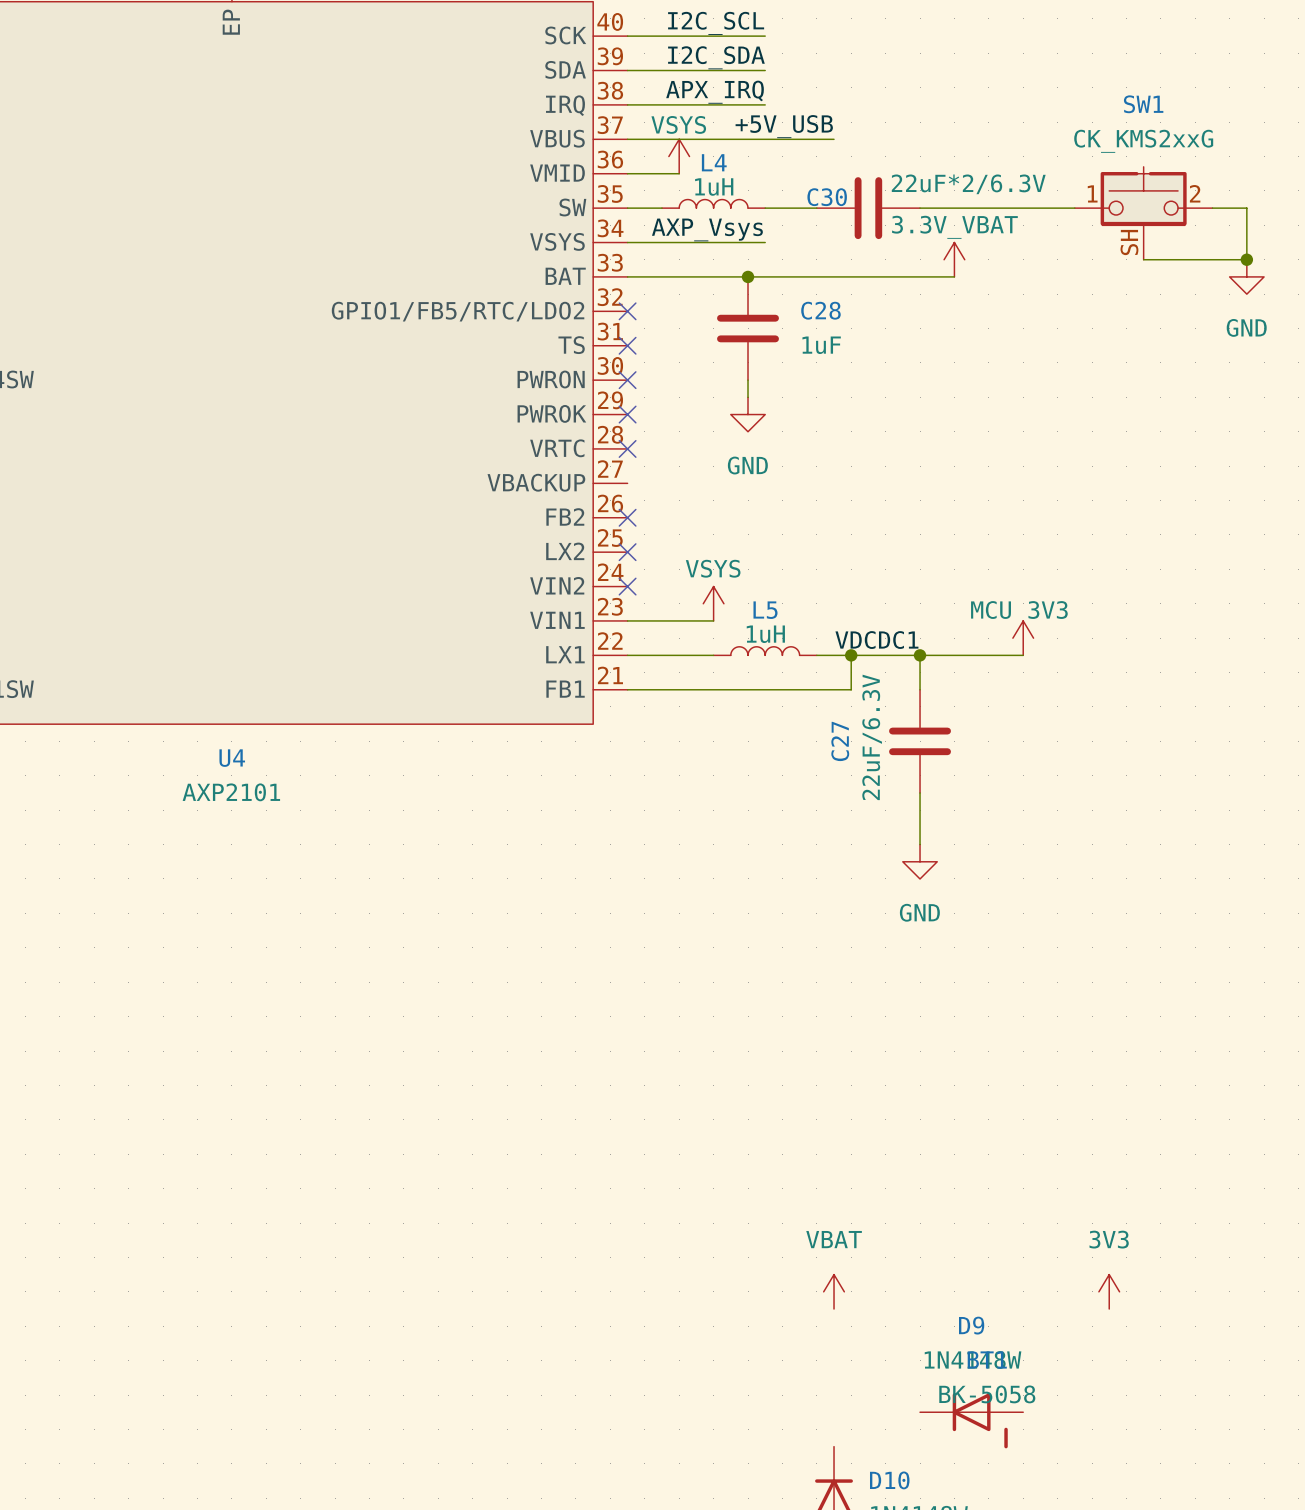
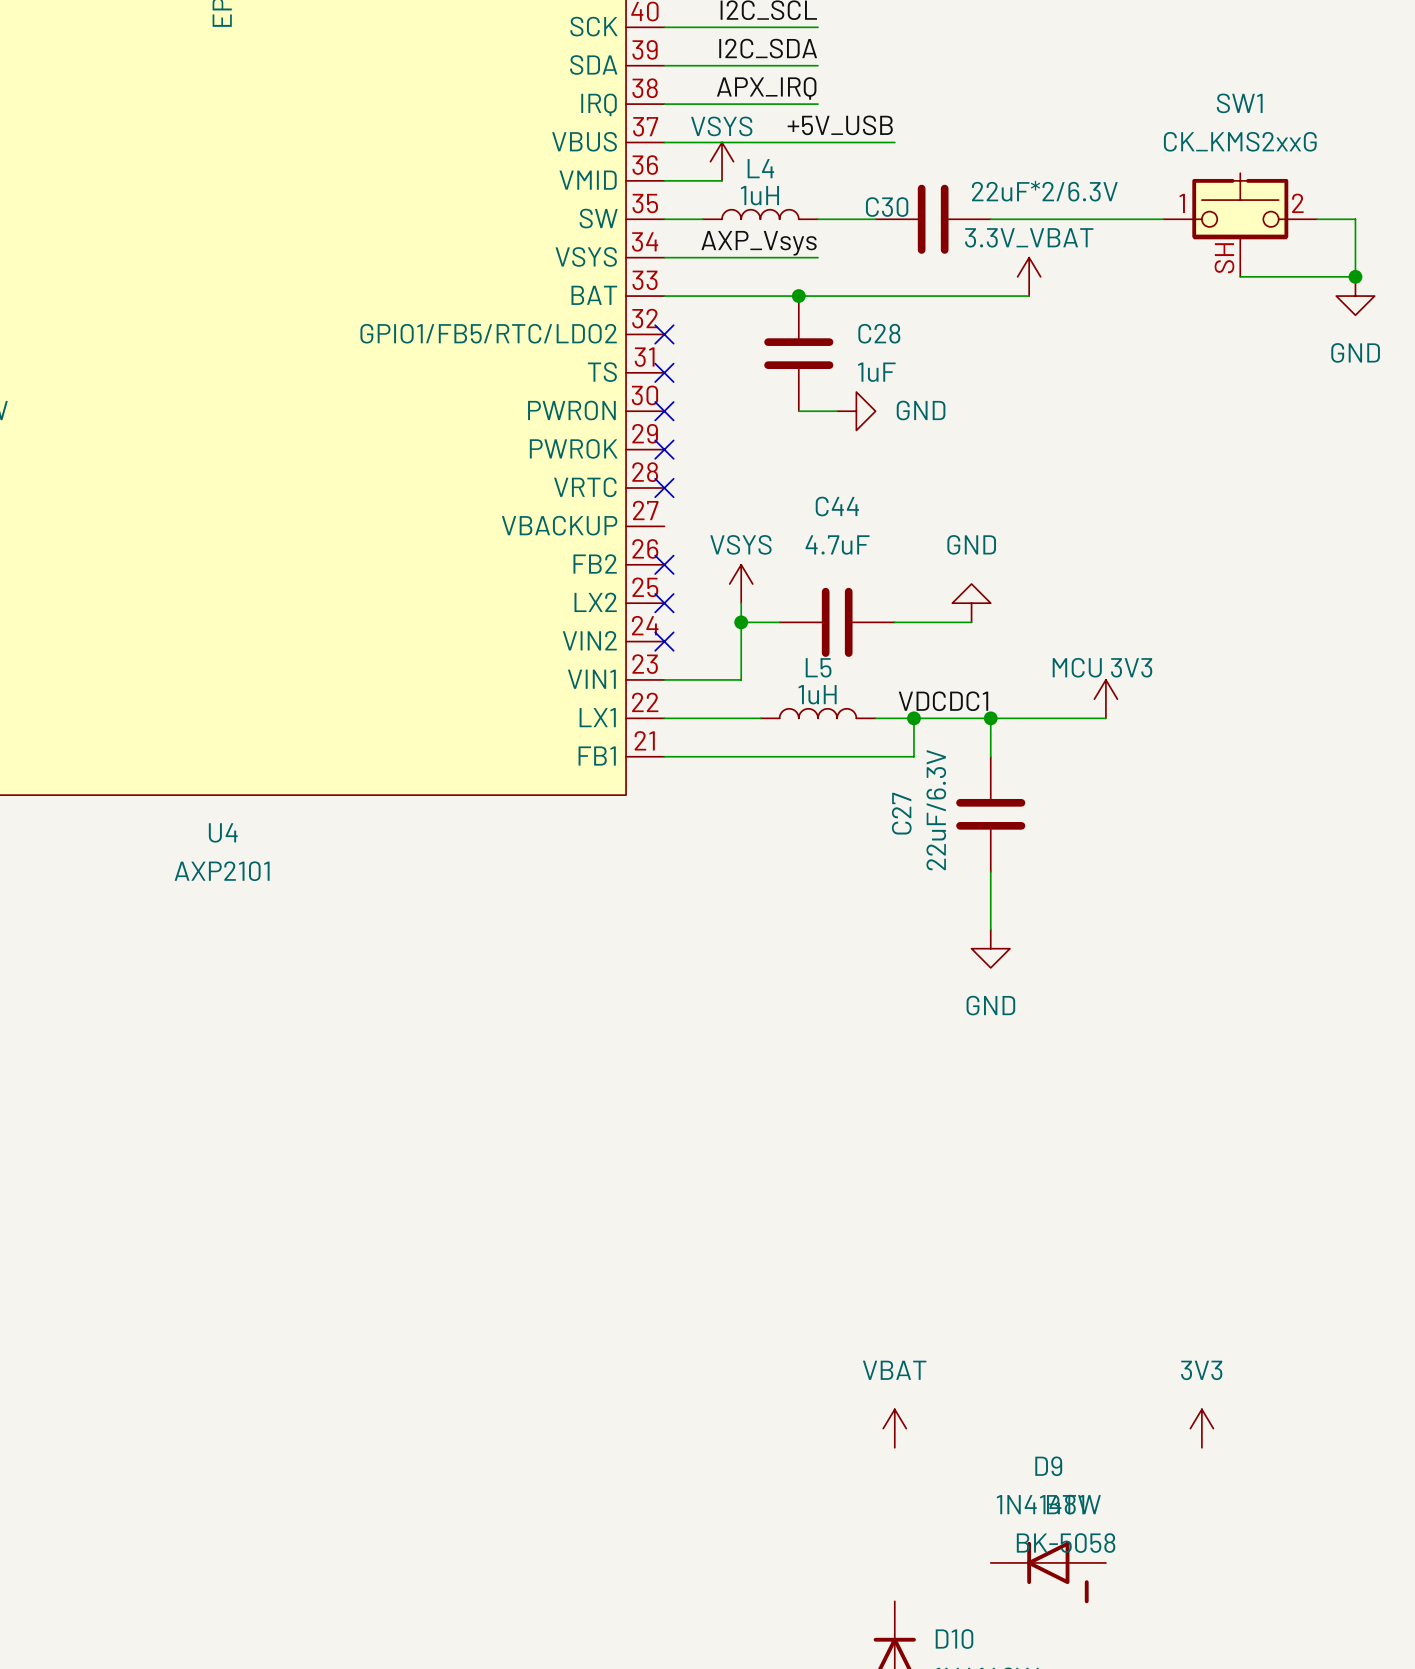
wire: (748, 380) (748, 397) -> (798, 411) (837, 411)
power symbol rotation: 0° (748, 414) -> 90° counterclockwise (856, 411)
power symbol position: GND (748, 414) -> GND (856, 411)
power symbol: none -> GND (971, 603)
wire: none -> (741, 622) (779, 622)
junction: none -> (741, 622)
C44: none -> 4.7uF (837, 622)
wire: none -> (894, 622) (971, 622)
power symbol position: VSYS (713, 603) -> VSYS (741, 583)
wire: (696, 620) (713, 620) -> (741, 679) (741, 603)

